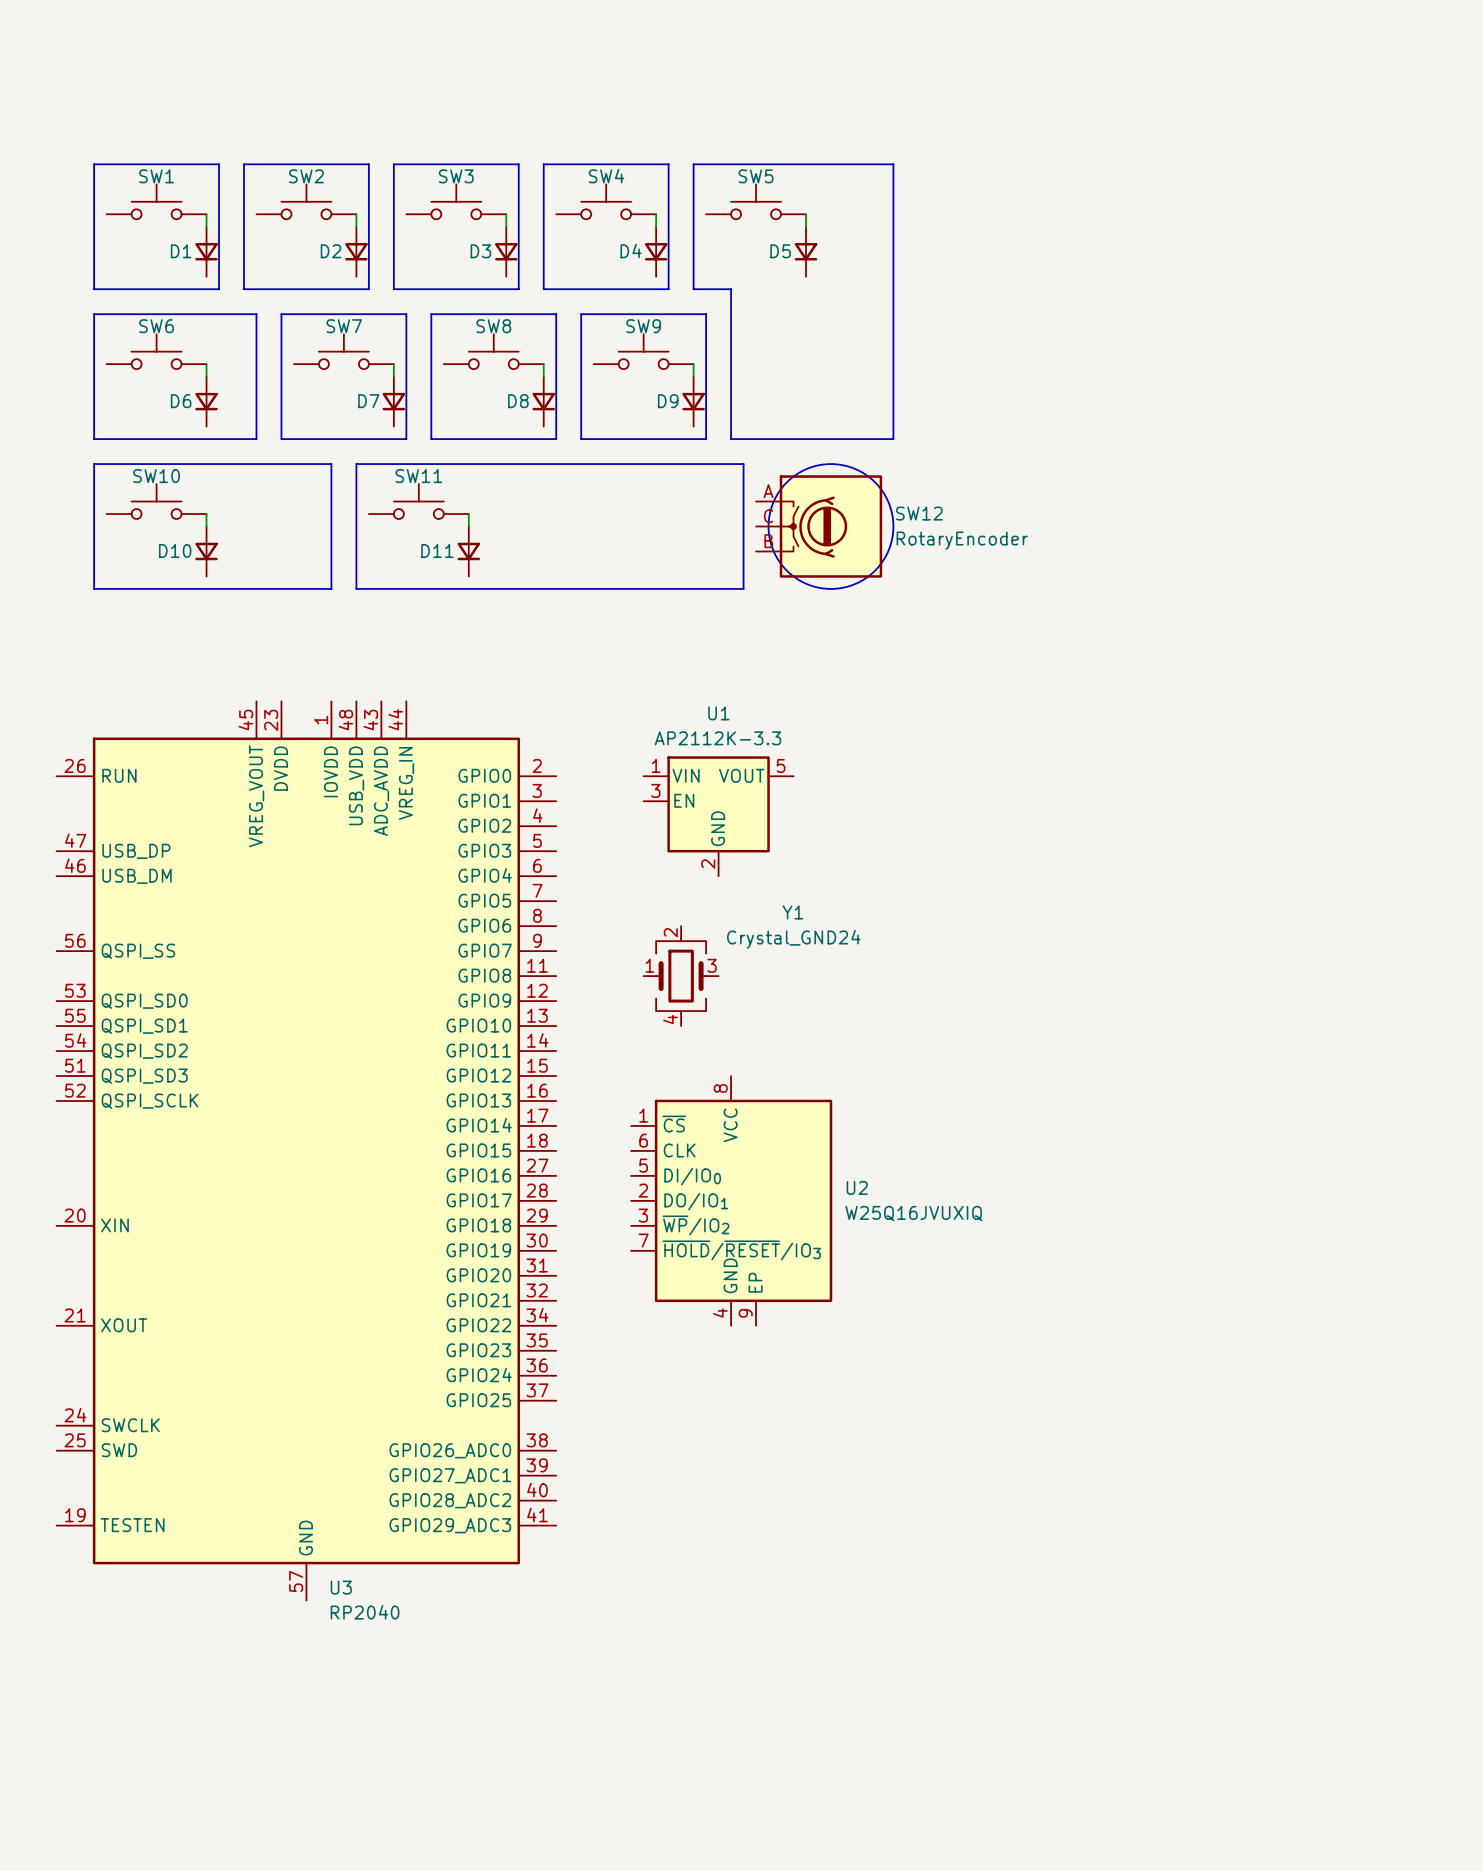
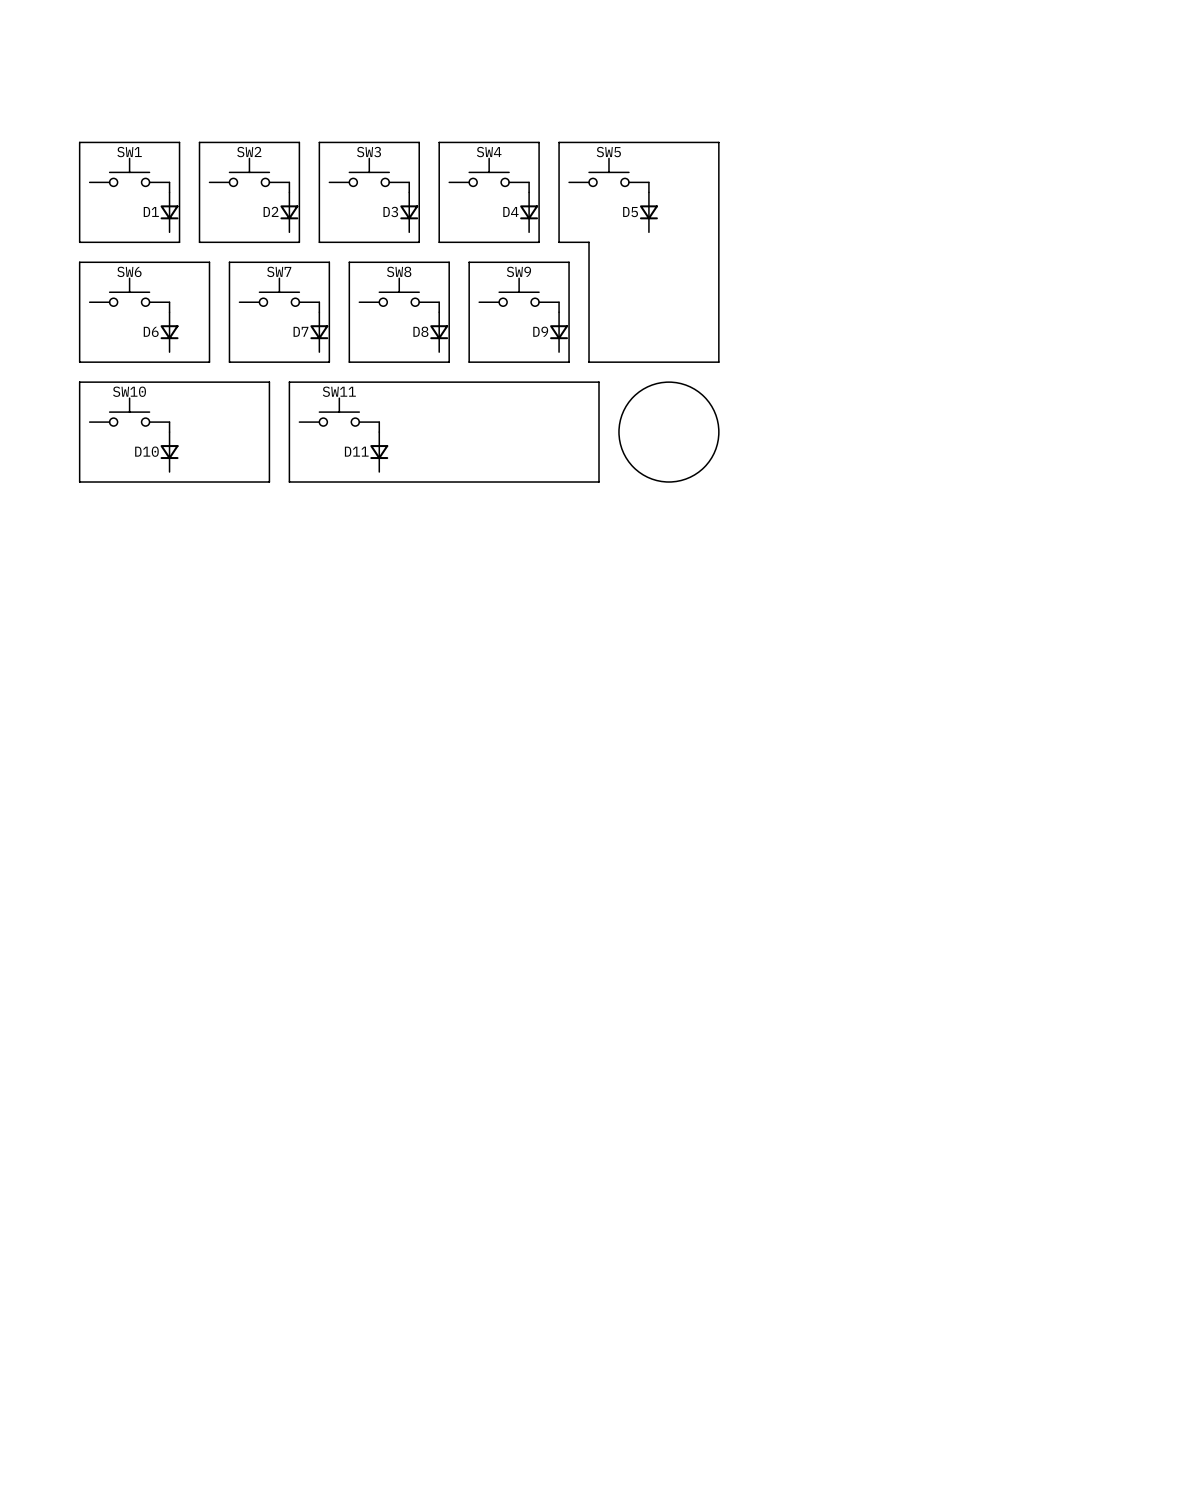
SW12: RotaryEncoder (819, 526) -> none
U1: AP2112K-3.3 (718, 816) -> none
Y1: Crystal_GND24 (681, 976) -> none
U3: RP2040 (306, 1150) -> none
U2: W25Q16JVUXIQ (731, 1200) -> none

